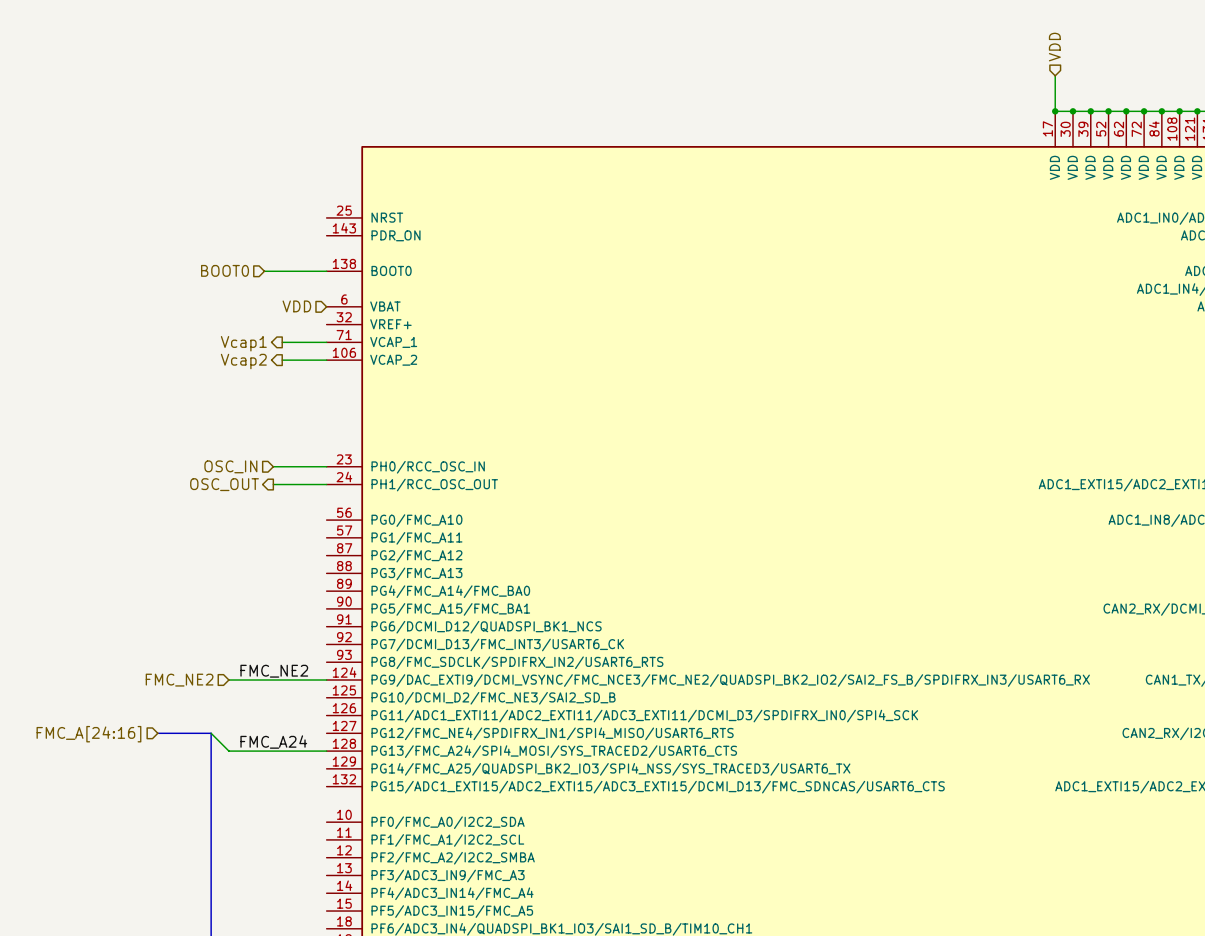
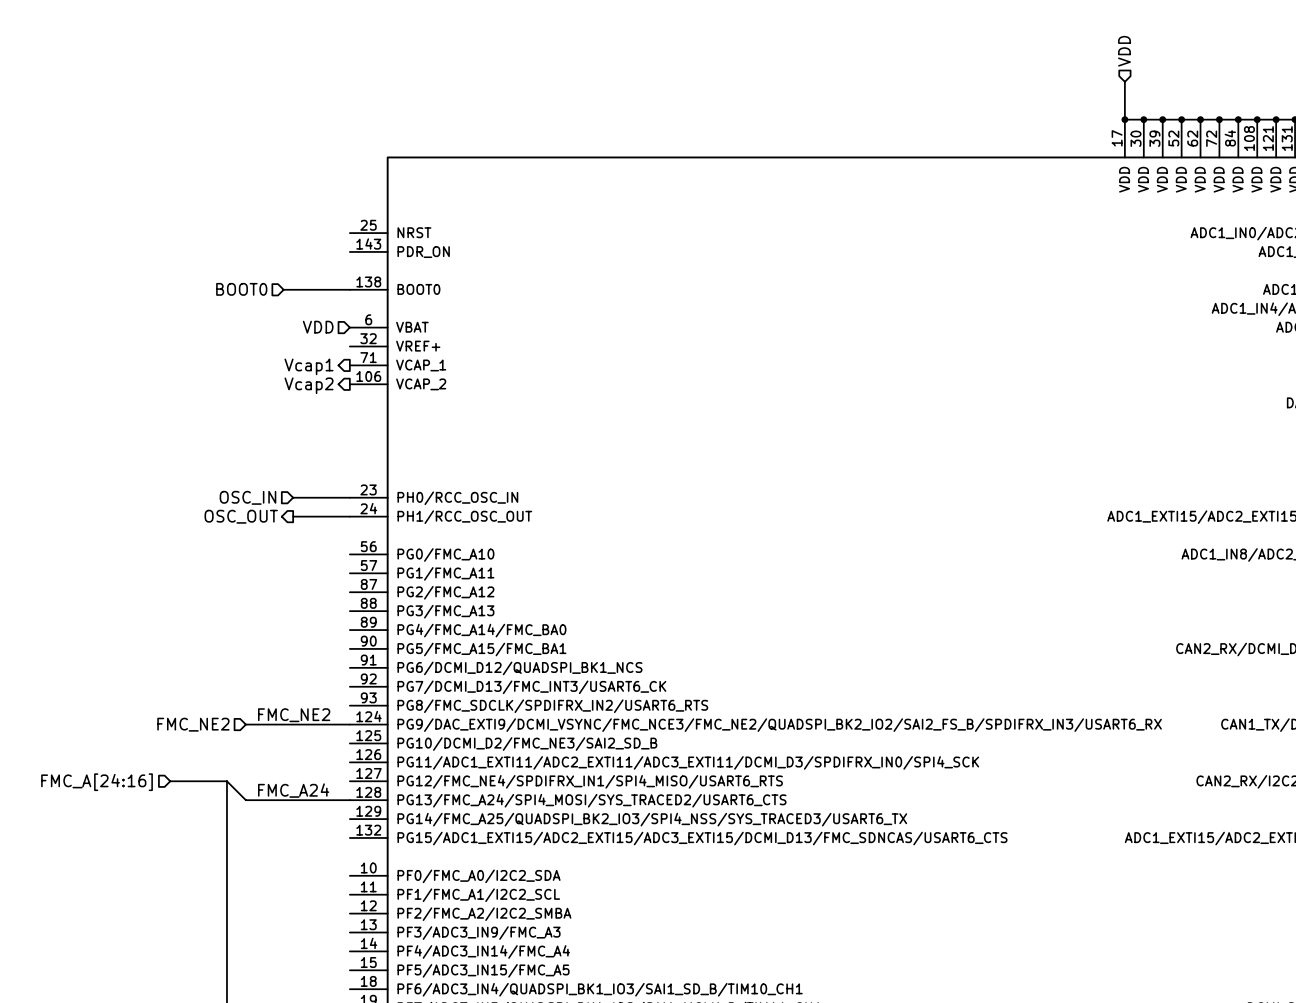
wire: (282, 342) (326, 342) -> none
hierarchical label position: Vcap1 (243, 343) -> Vcap1 (309, 366)
wire: (282, 360) (326, 360) -> none
hierarchical label position: Vcap2 (243, 361) -> Vcap2 (309, 385)

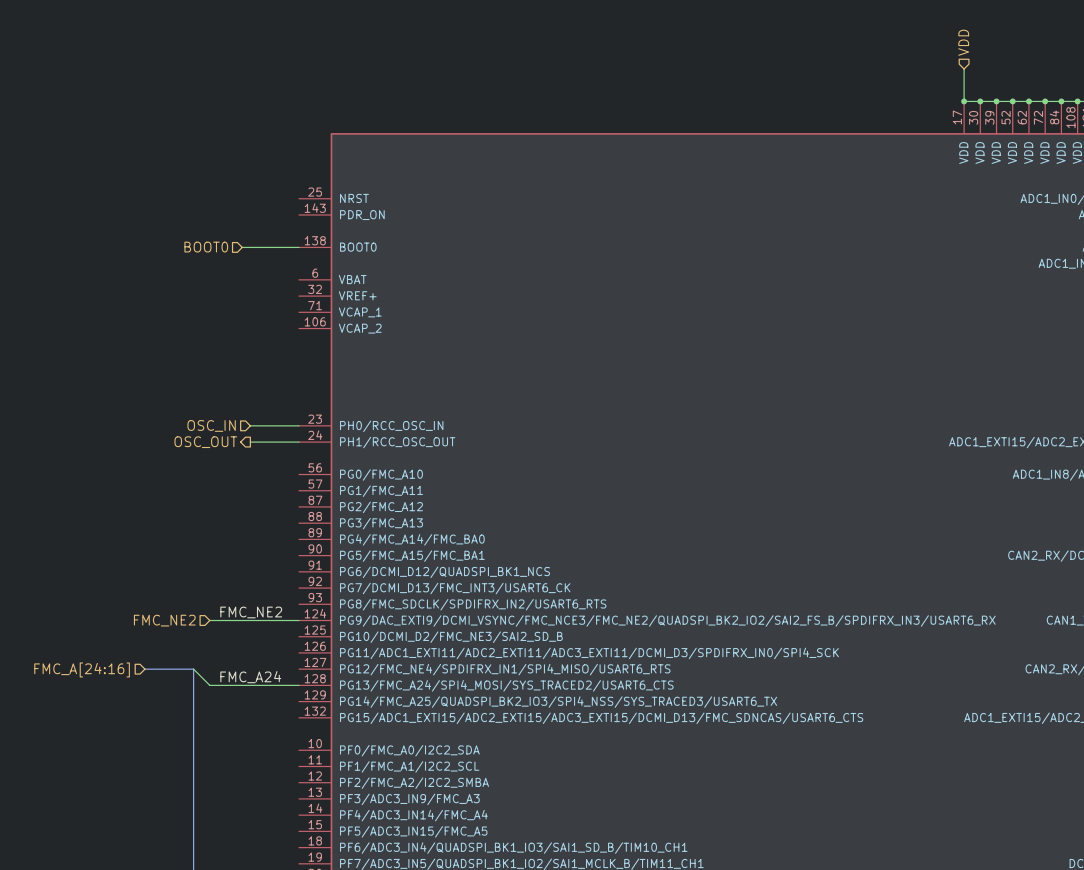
hierarchical label: VDD (318, 327) -> none
hierarchical label: Vcap1 (309, 366) -> none
hierarchical label: Vcap2 (309, 385) -> none

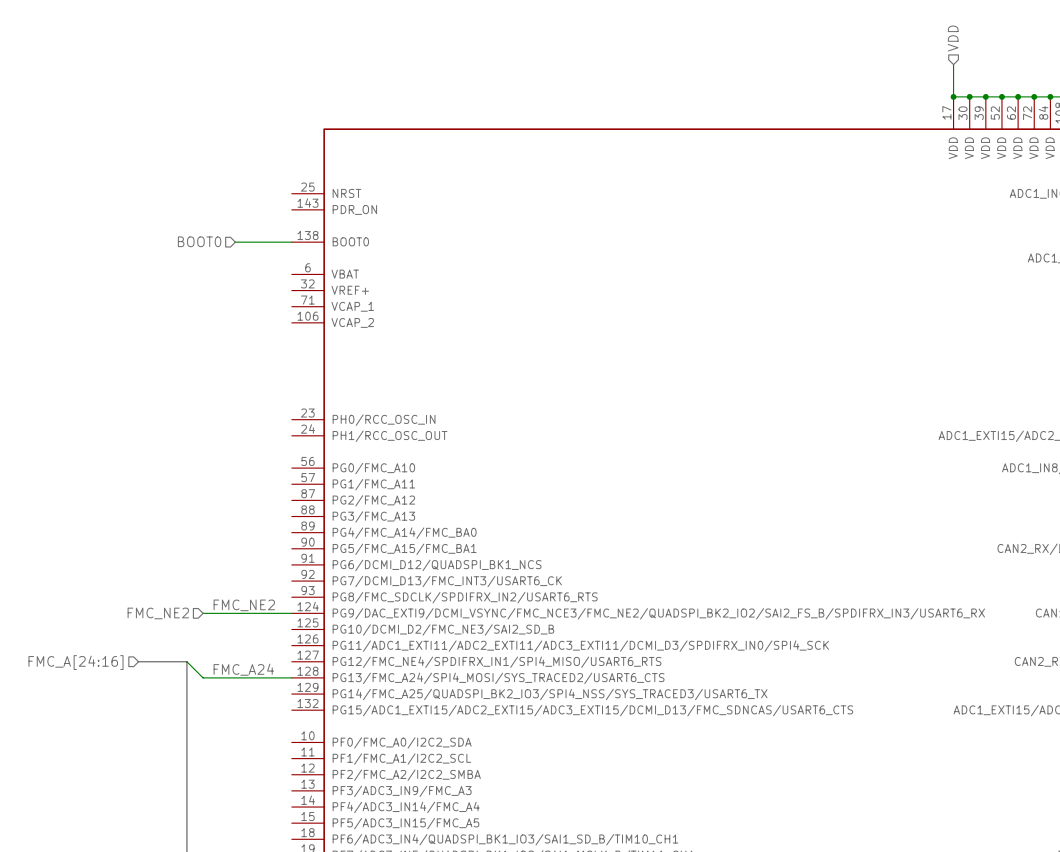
hierarchical label: OSC_IN (211, 425) -> none
wire: (250, 425) (299, 425) -> none
hierarchical label: OSC_OUT (205, 442) -> none
wire: (250, 442) (299, 442) -> none

